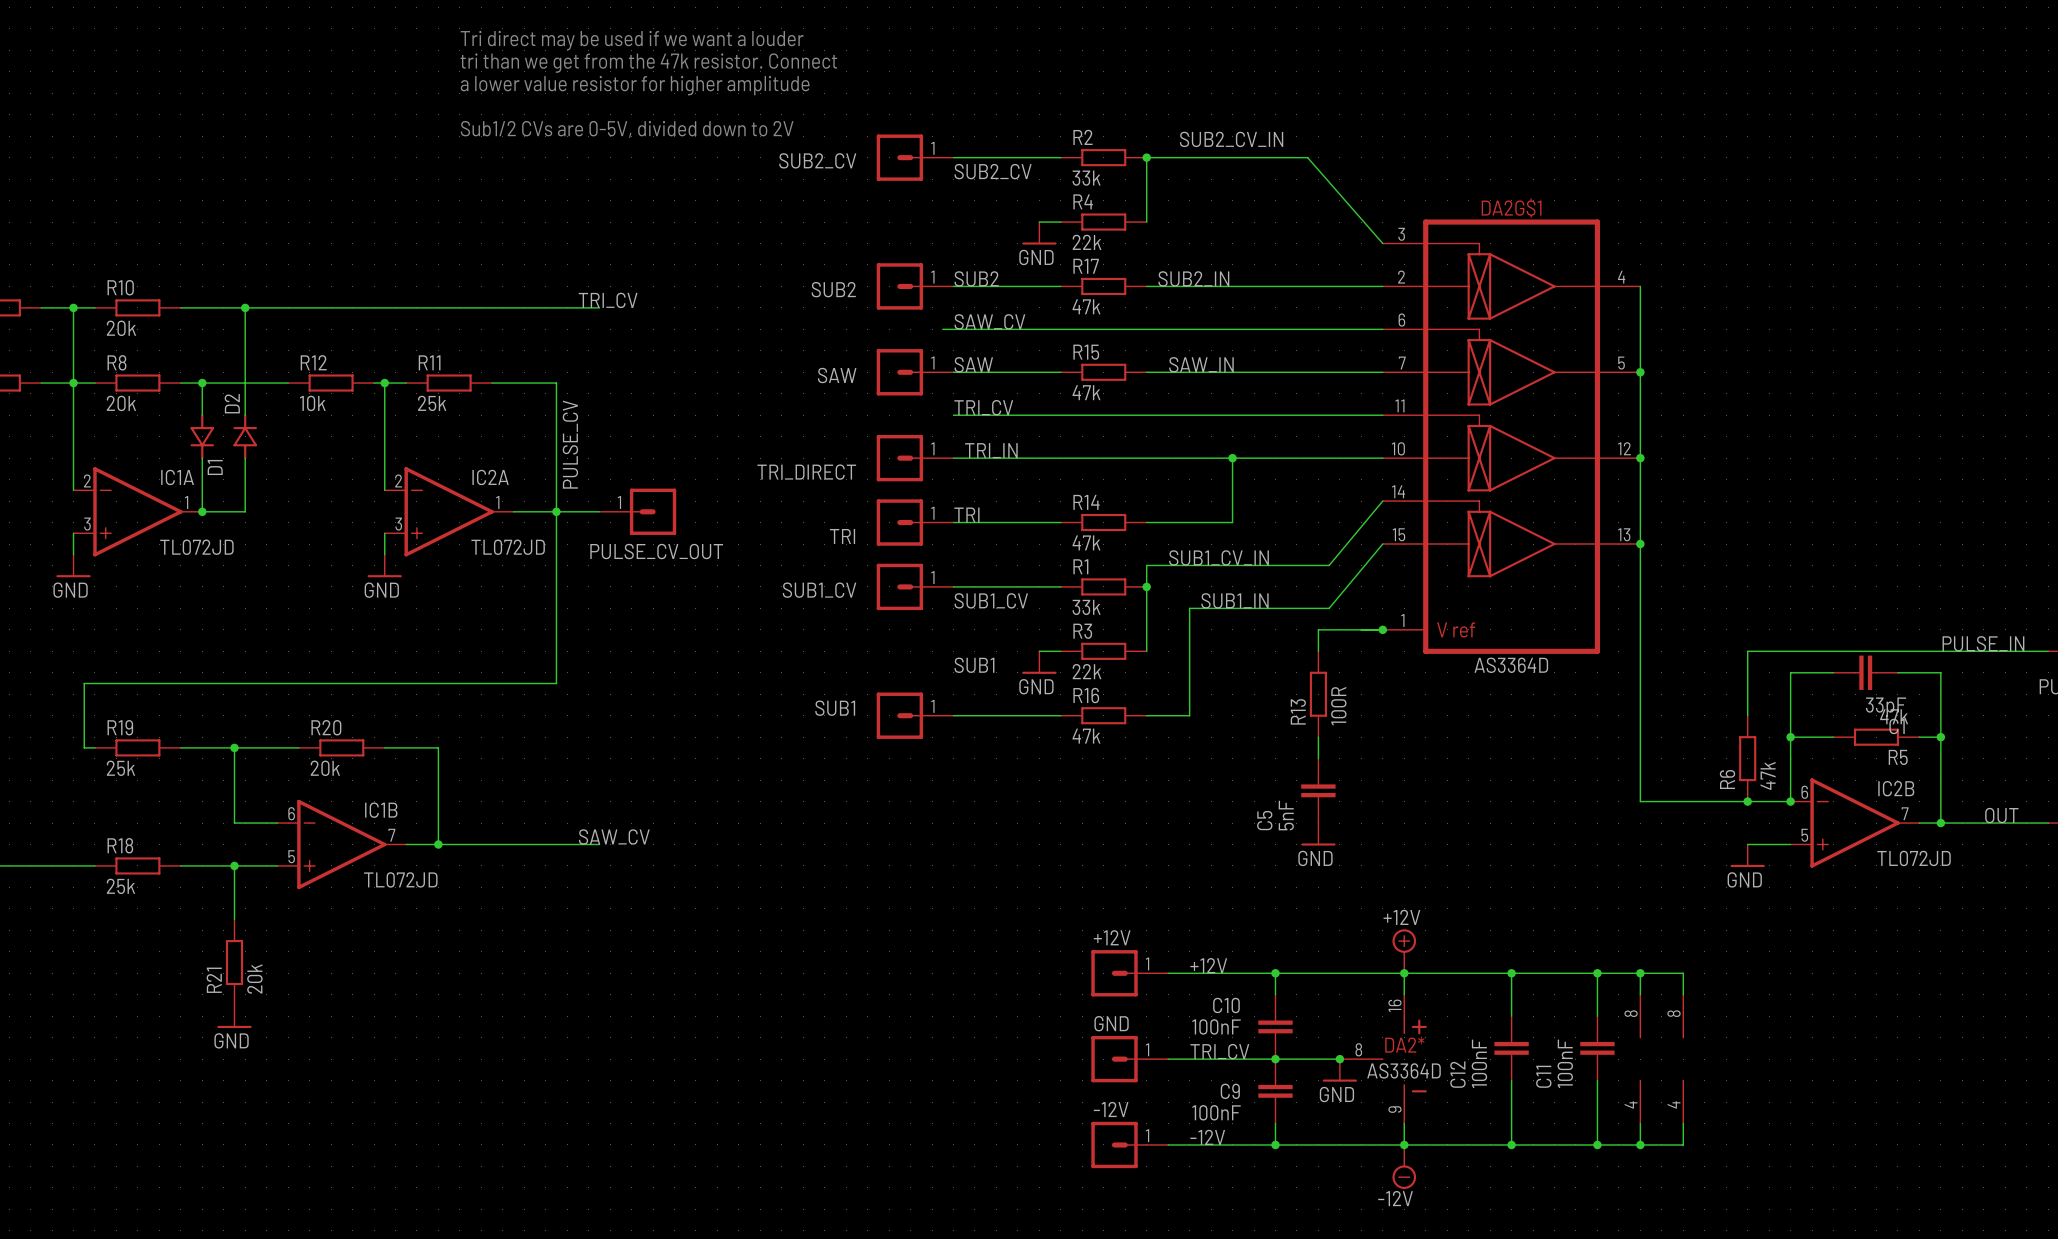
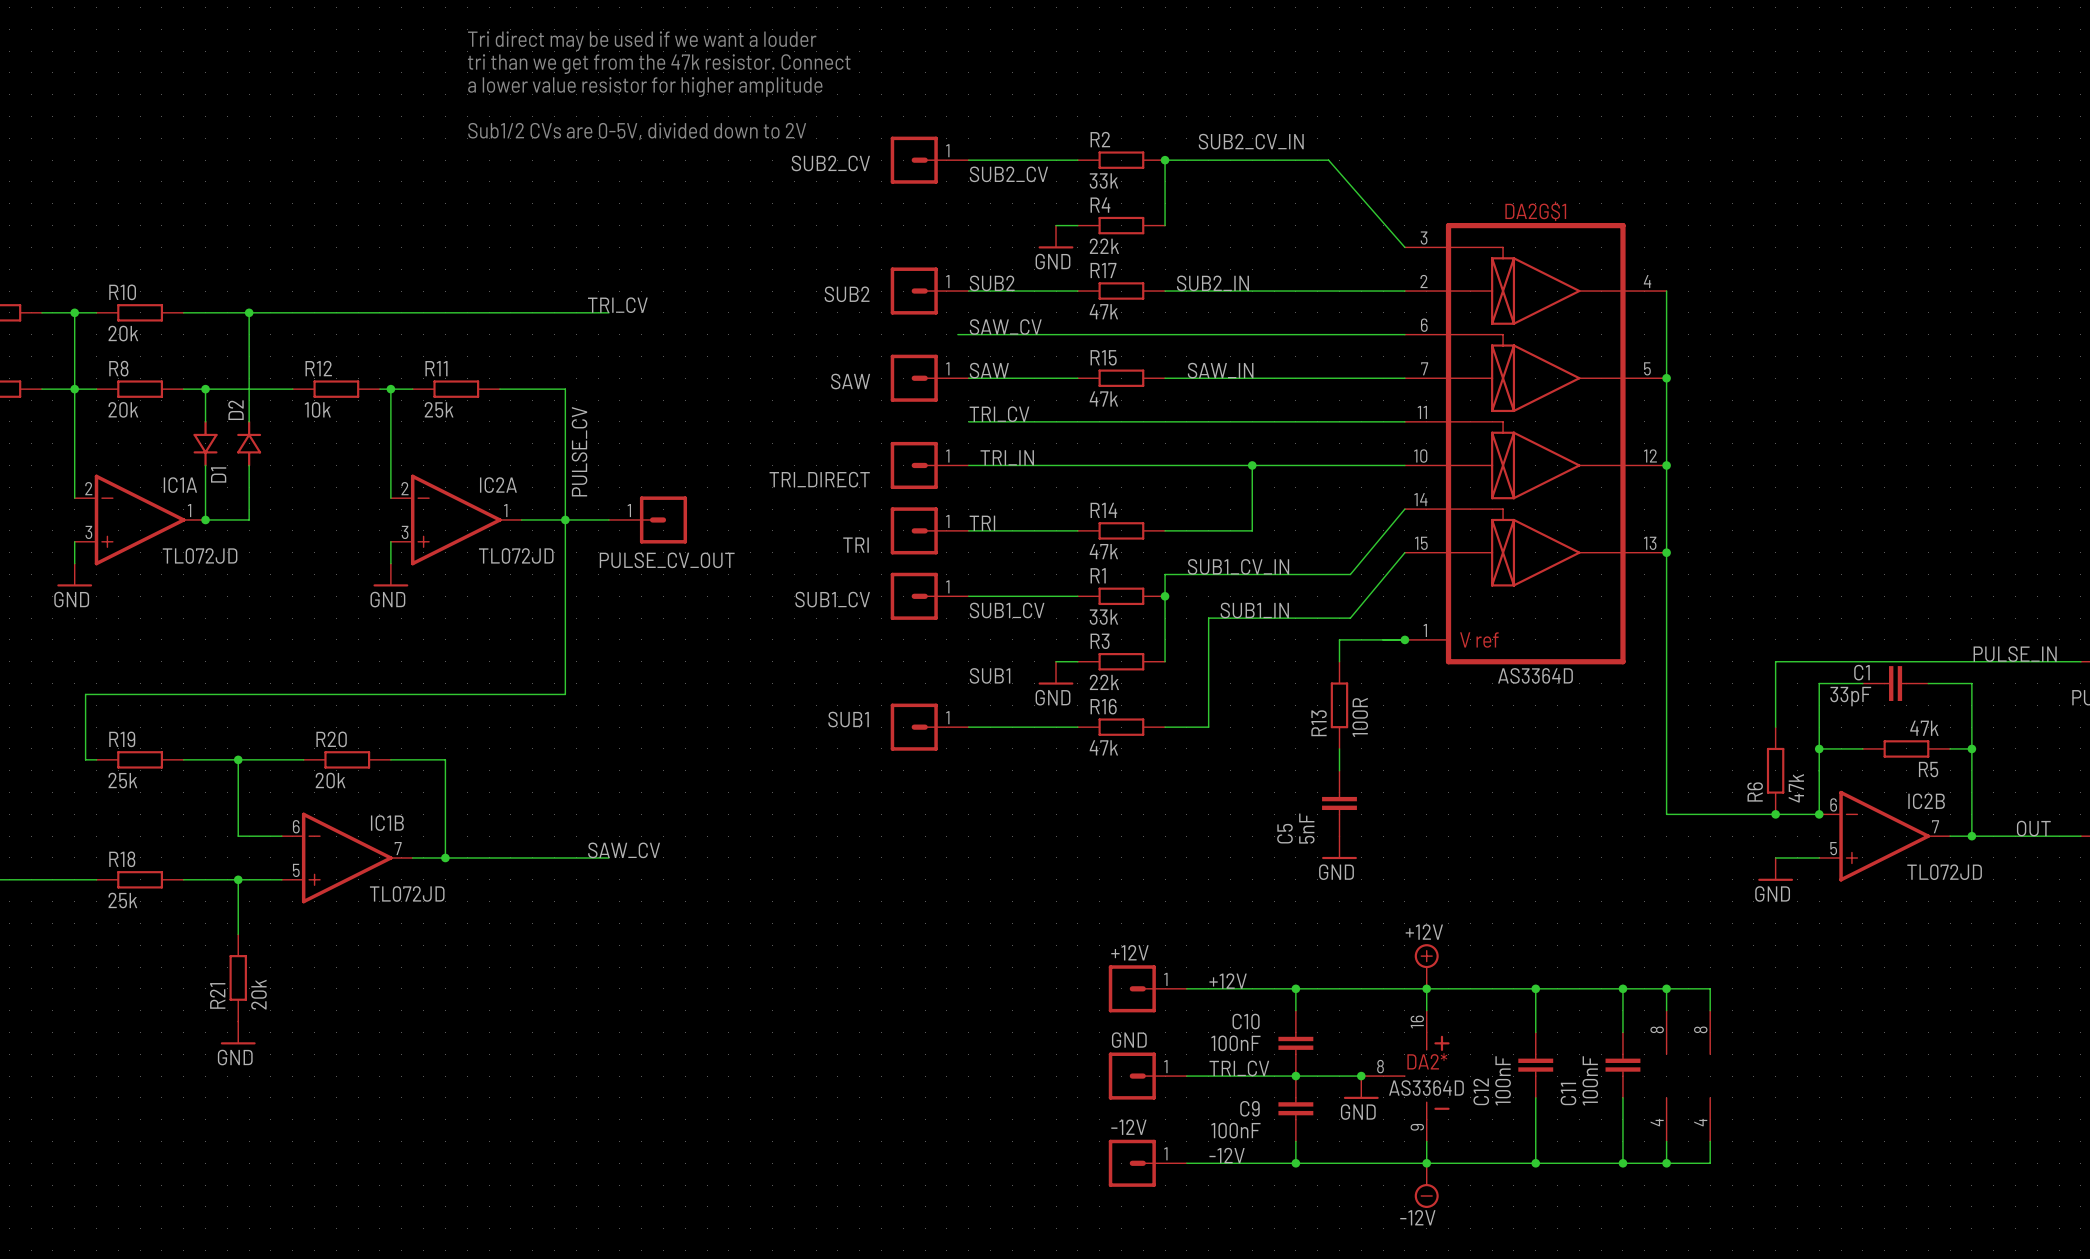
C1 value position: 33pF (1886, 707) -> 33pF (1850, 696)
C1 name position: C1 (1897, 726) -> C1 (1861, 672)

